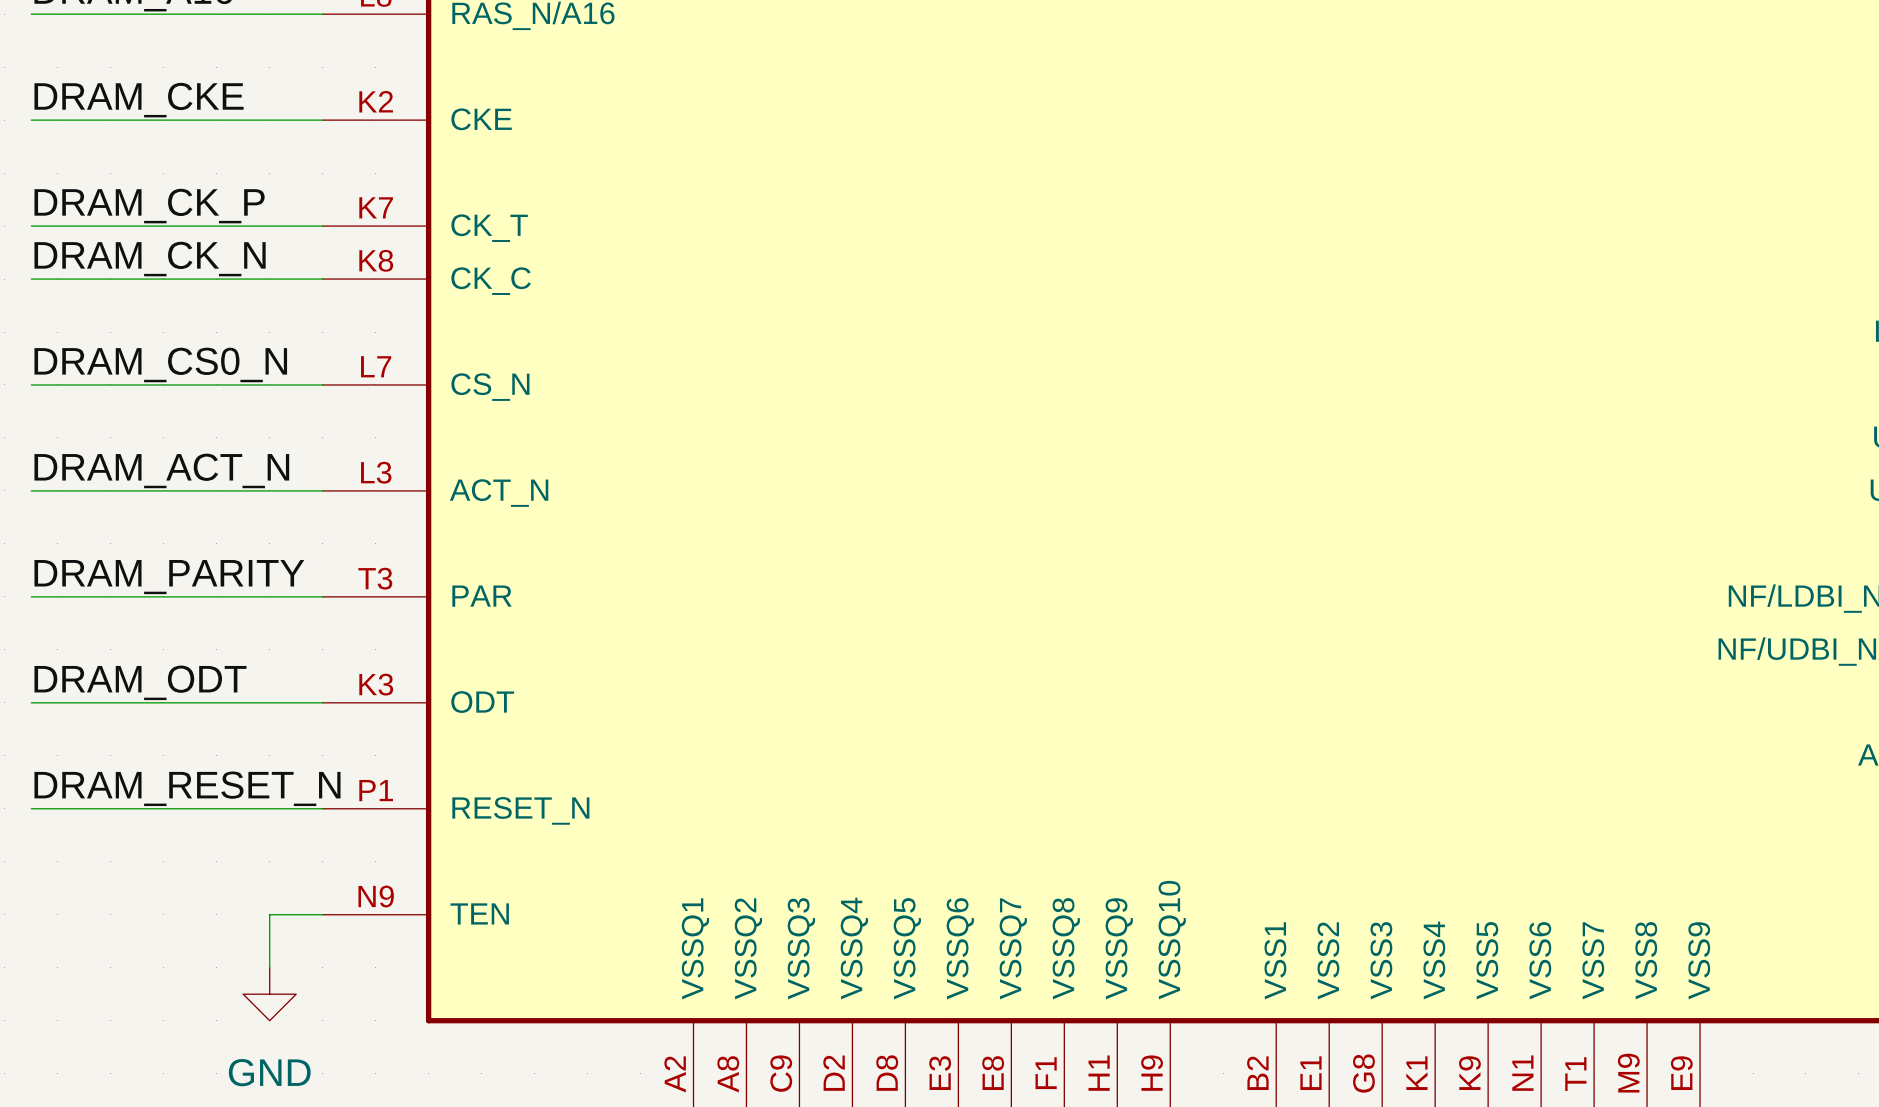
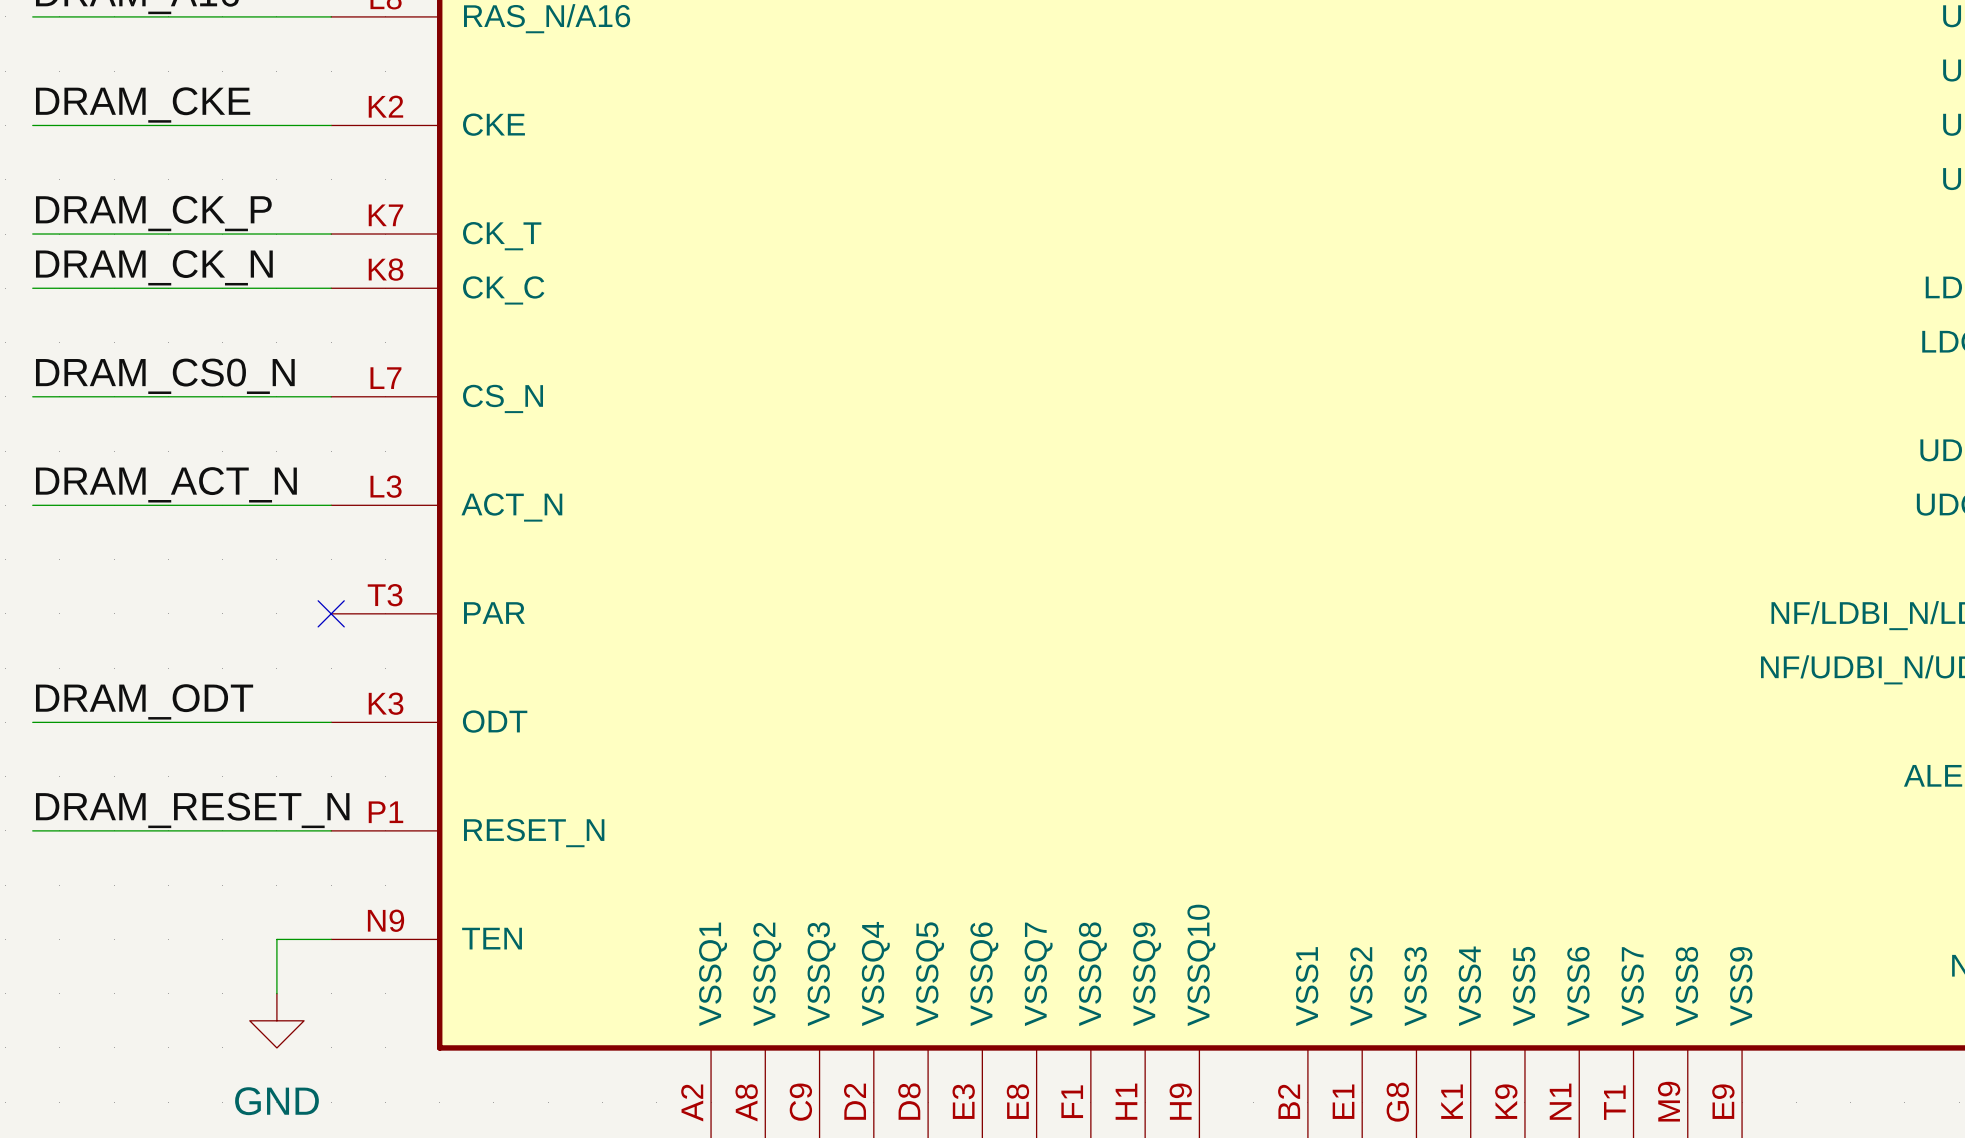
label: DRAM_PARITY (169, 577) -> none
wire: (31, 596) (322, 596) -> none
no-connect mark: none -> (331, 613)

